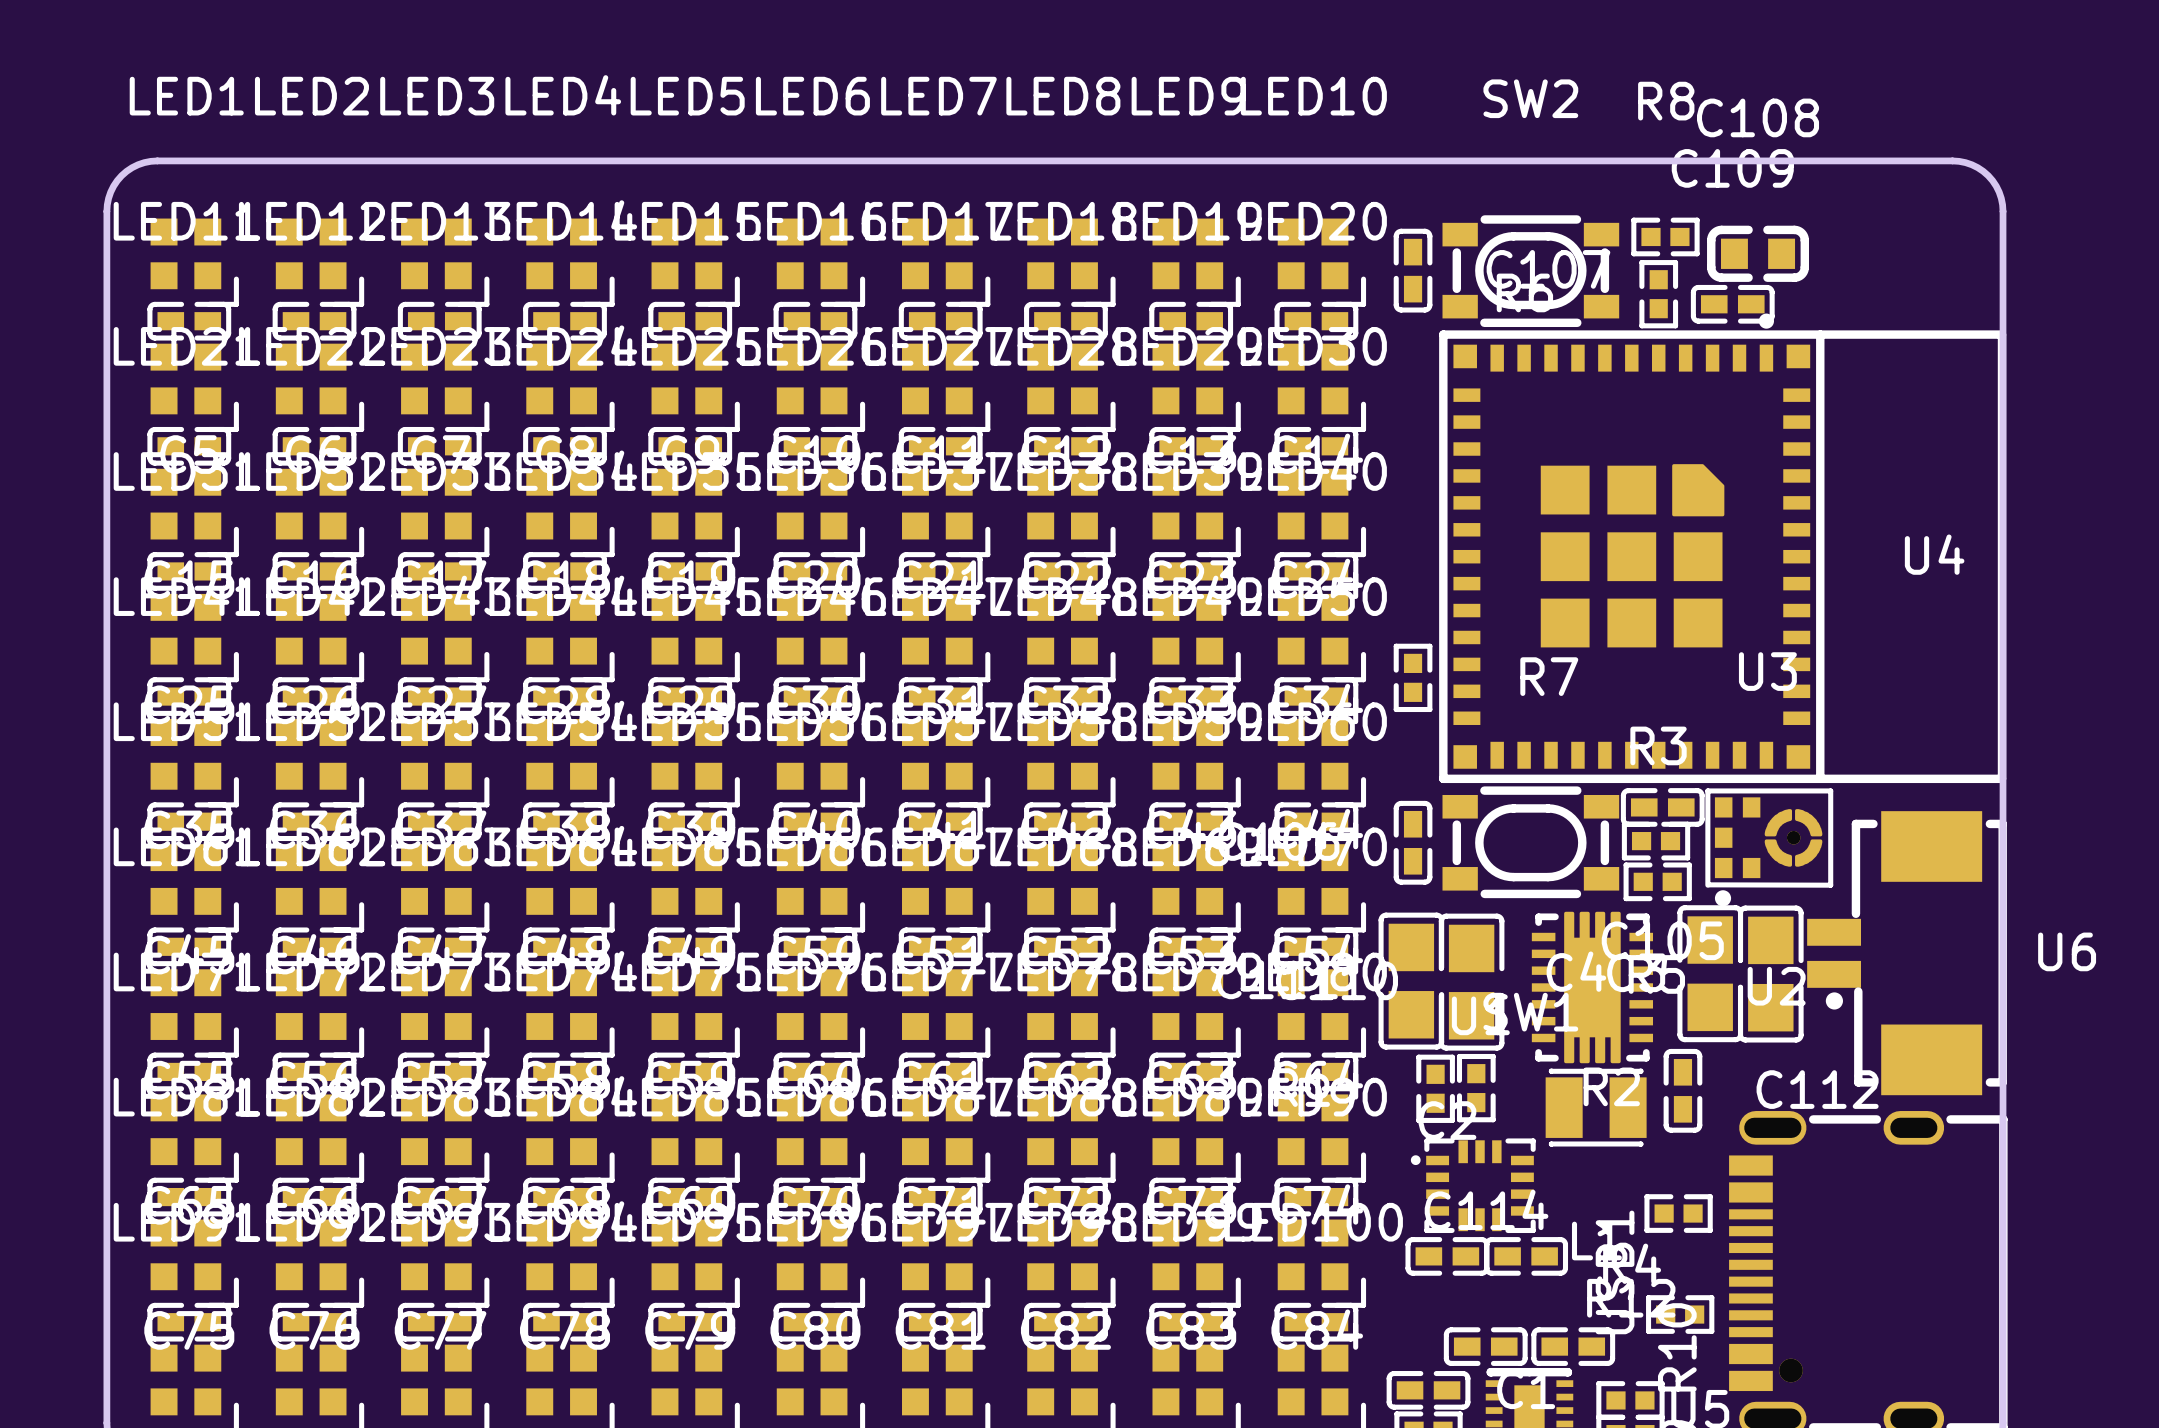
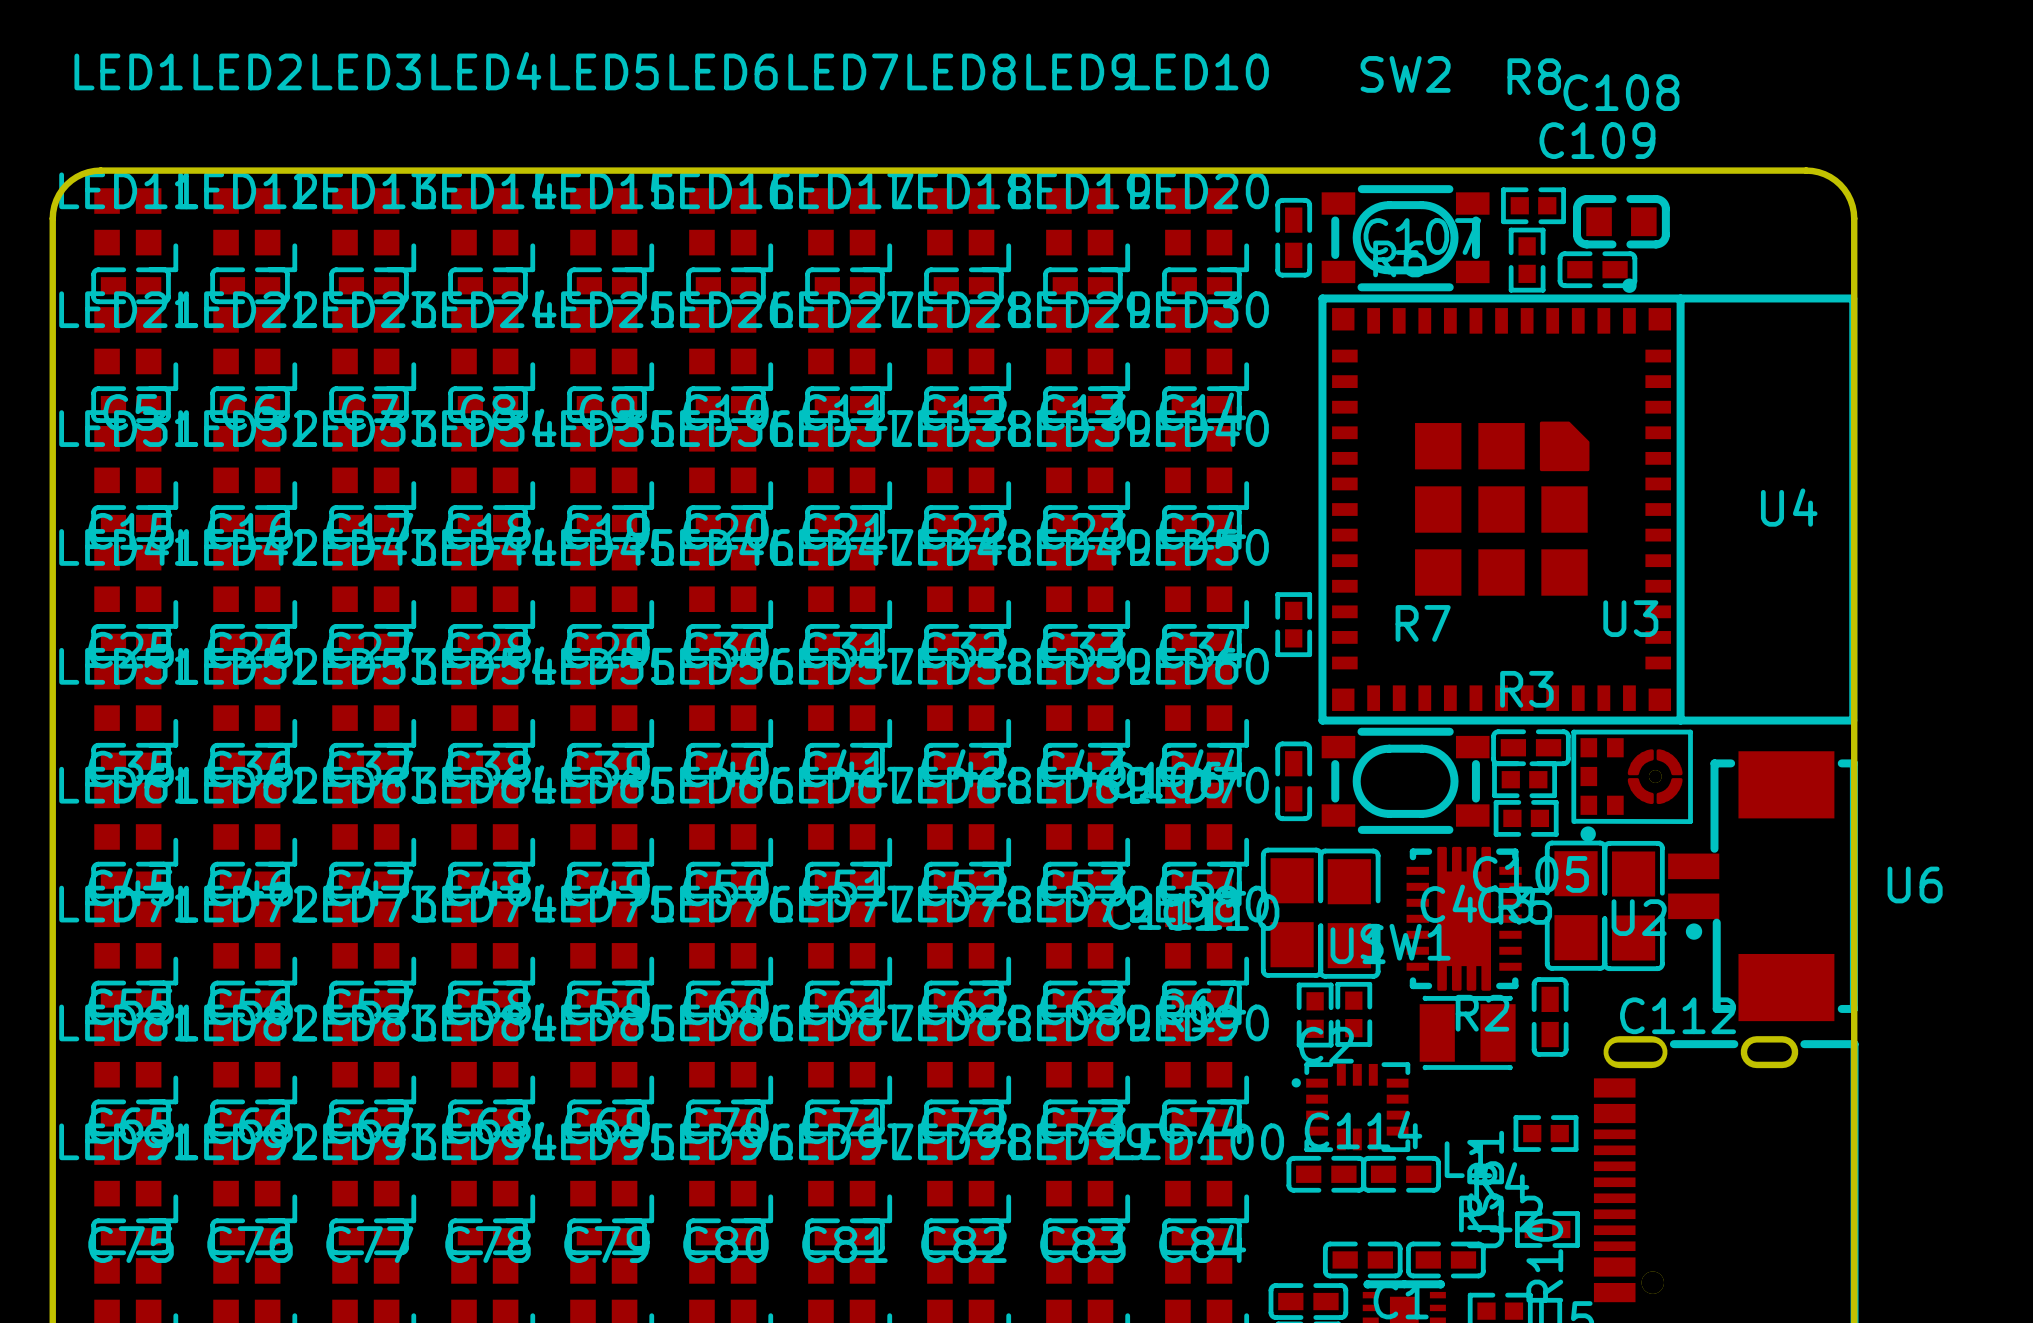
board edge: (106, 250) (107, 204) (113, 186) (121, 175) (132, 167) (144, 162) (157, 160) (1952, 160) (1965, 162) (1977, 167) (1988, 175) (1996, 186) (2002, 204) (2003, 250) -> (52, 218) (56, 200) (66, 184) (82, 174) (100, 170) (1806, 170) (1824, 174) (1840, 184) (1850, 200) (1854, 218)

